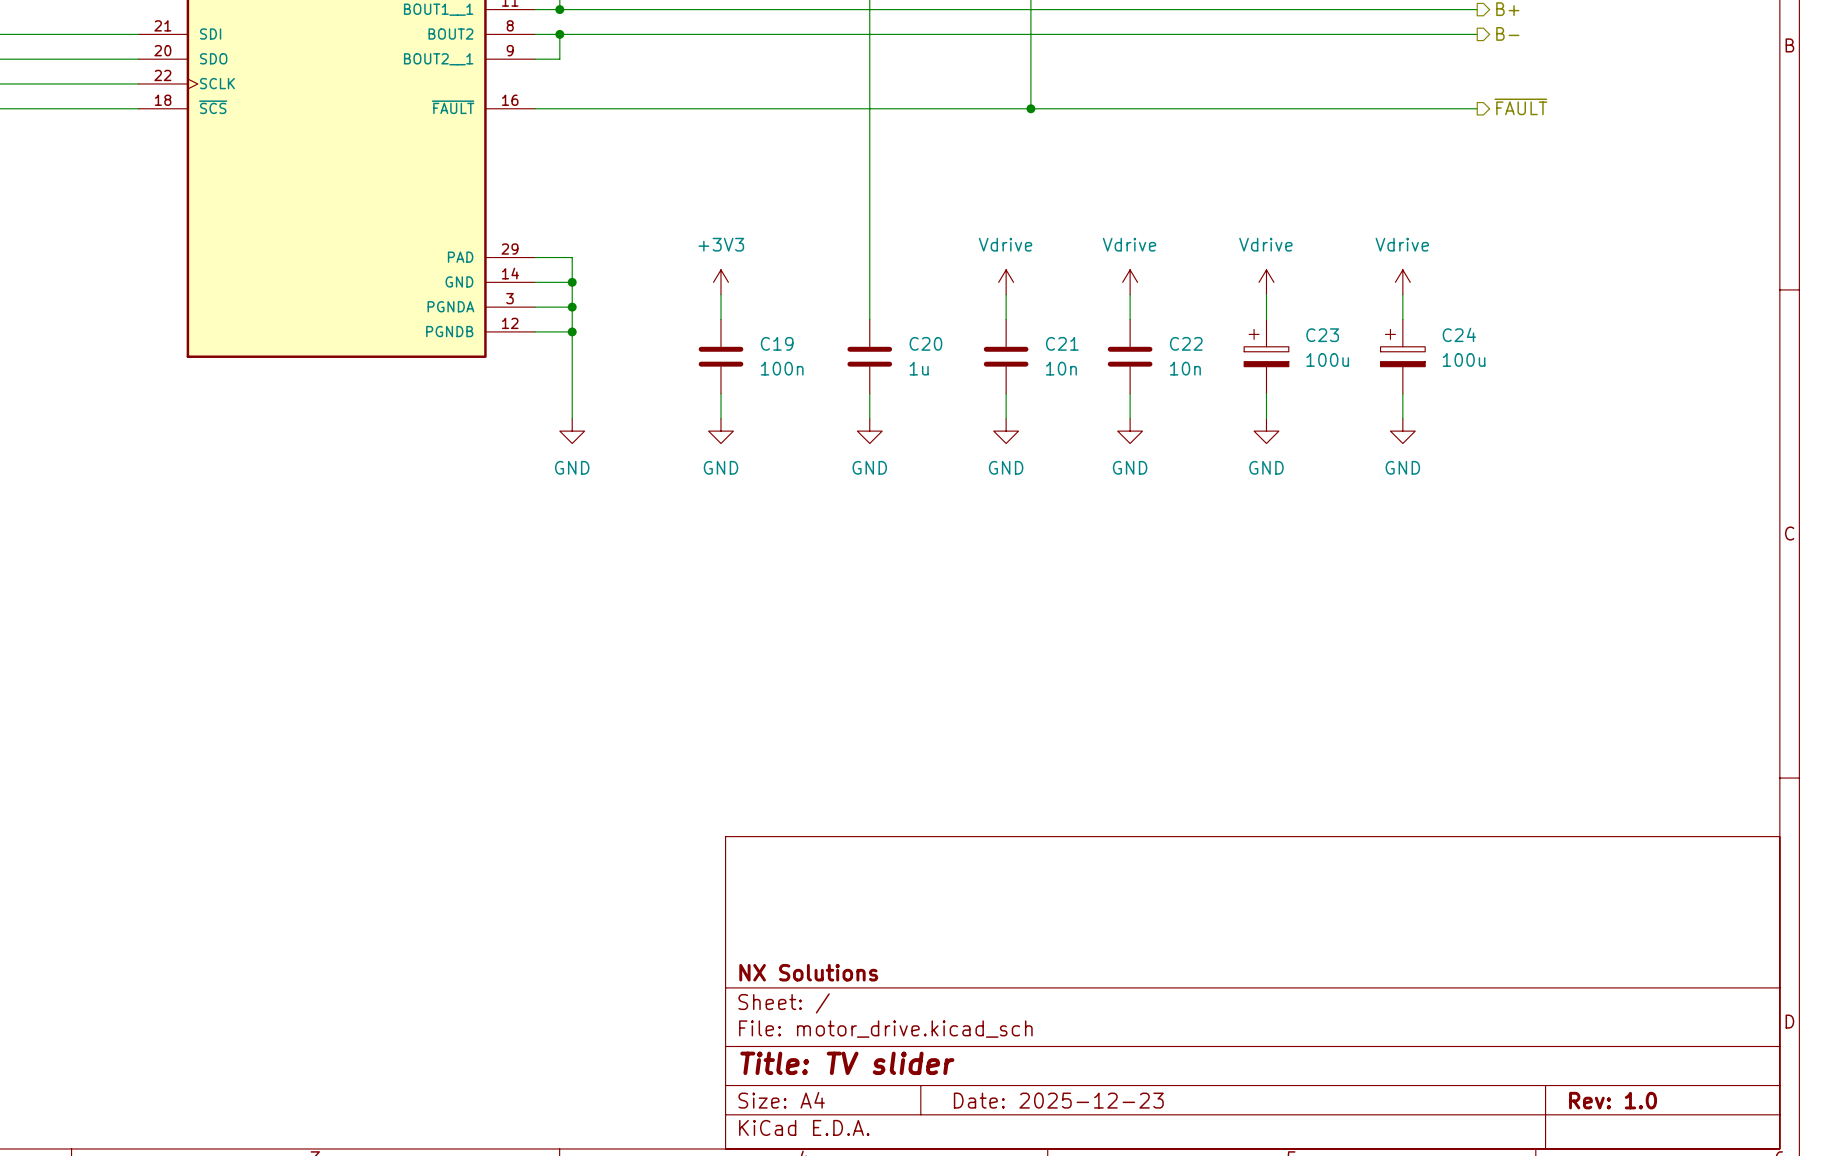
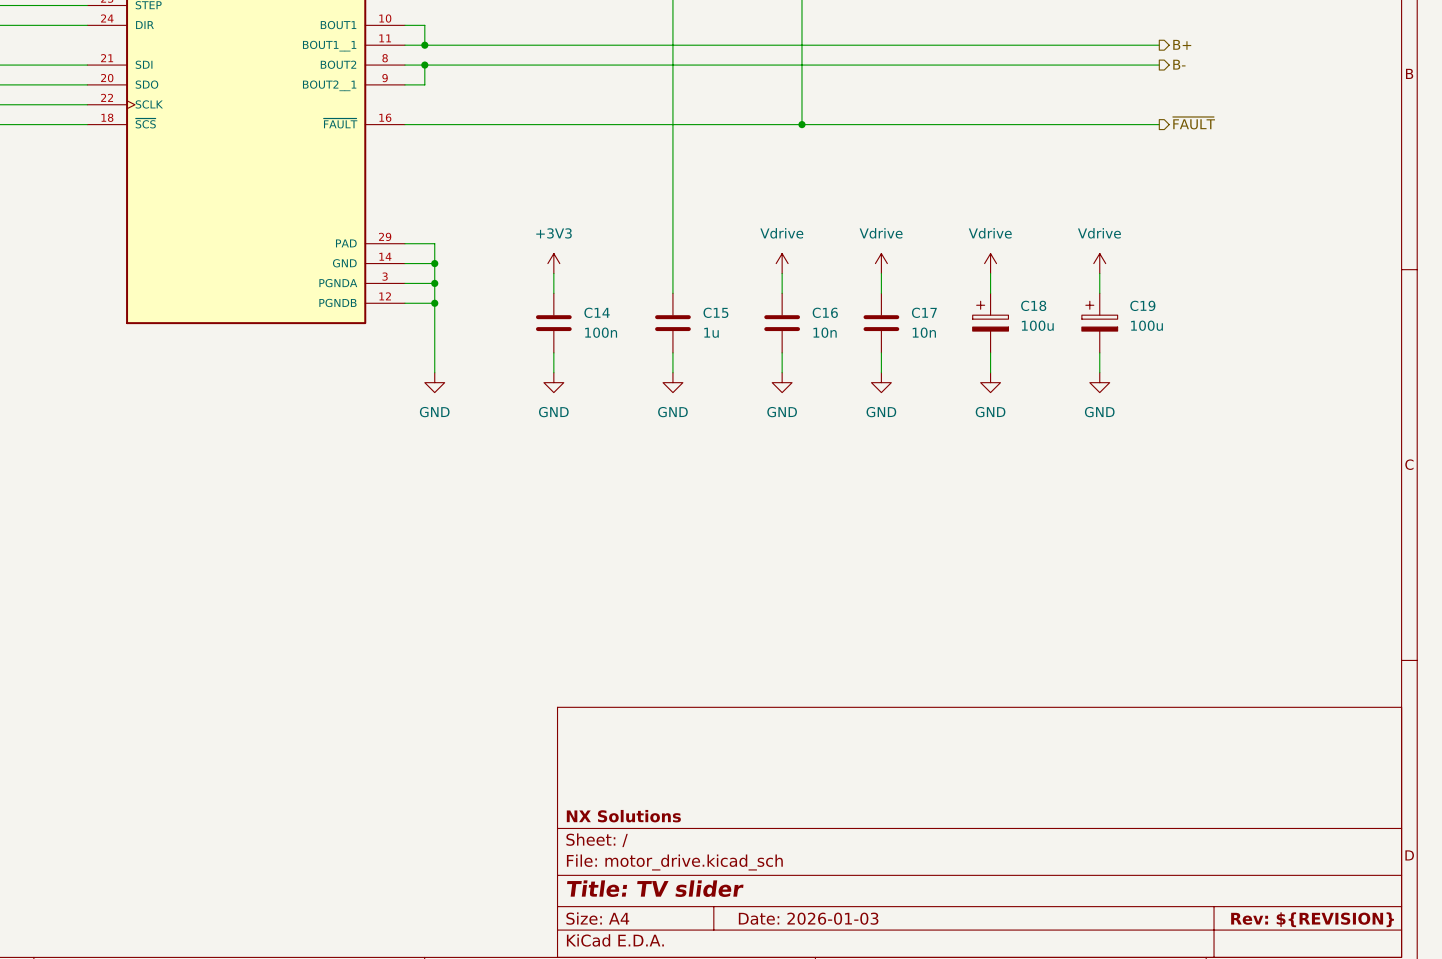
C24 name: C24 (1459, 334) -> C19 (1142, 305)
C23 name: C23 (1322, 335) -> C18 (1033, 305)
C19 name: C19 (777, 343) -> C14 (597, 312)
C20 name: C20 (925, 343) -> C15 (715, 312)
C21 name: C21 (1062, 343) -> C16 (825, 312)
C22 name: C22 (1186, 343) -> C17 (924, 312)
title block: Date: 2025-12-23 (1058, 1100) -> Date: 2026-01-03 (808, 918)
title block: Rev: 1.0 (1613, 1100) -> Rev: ${REVISION} (1312, 919)

